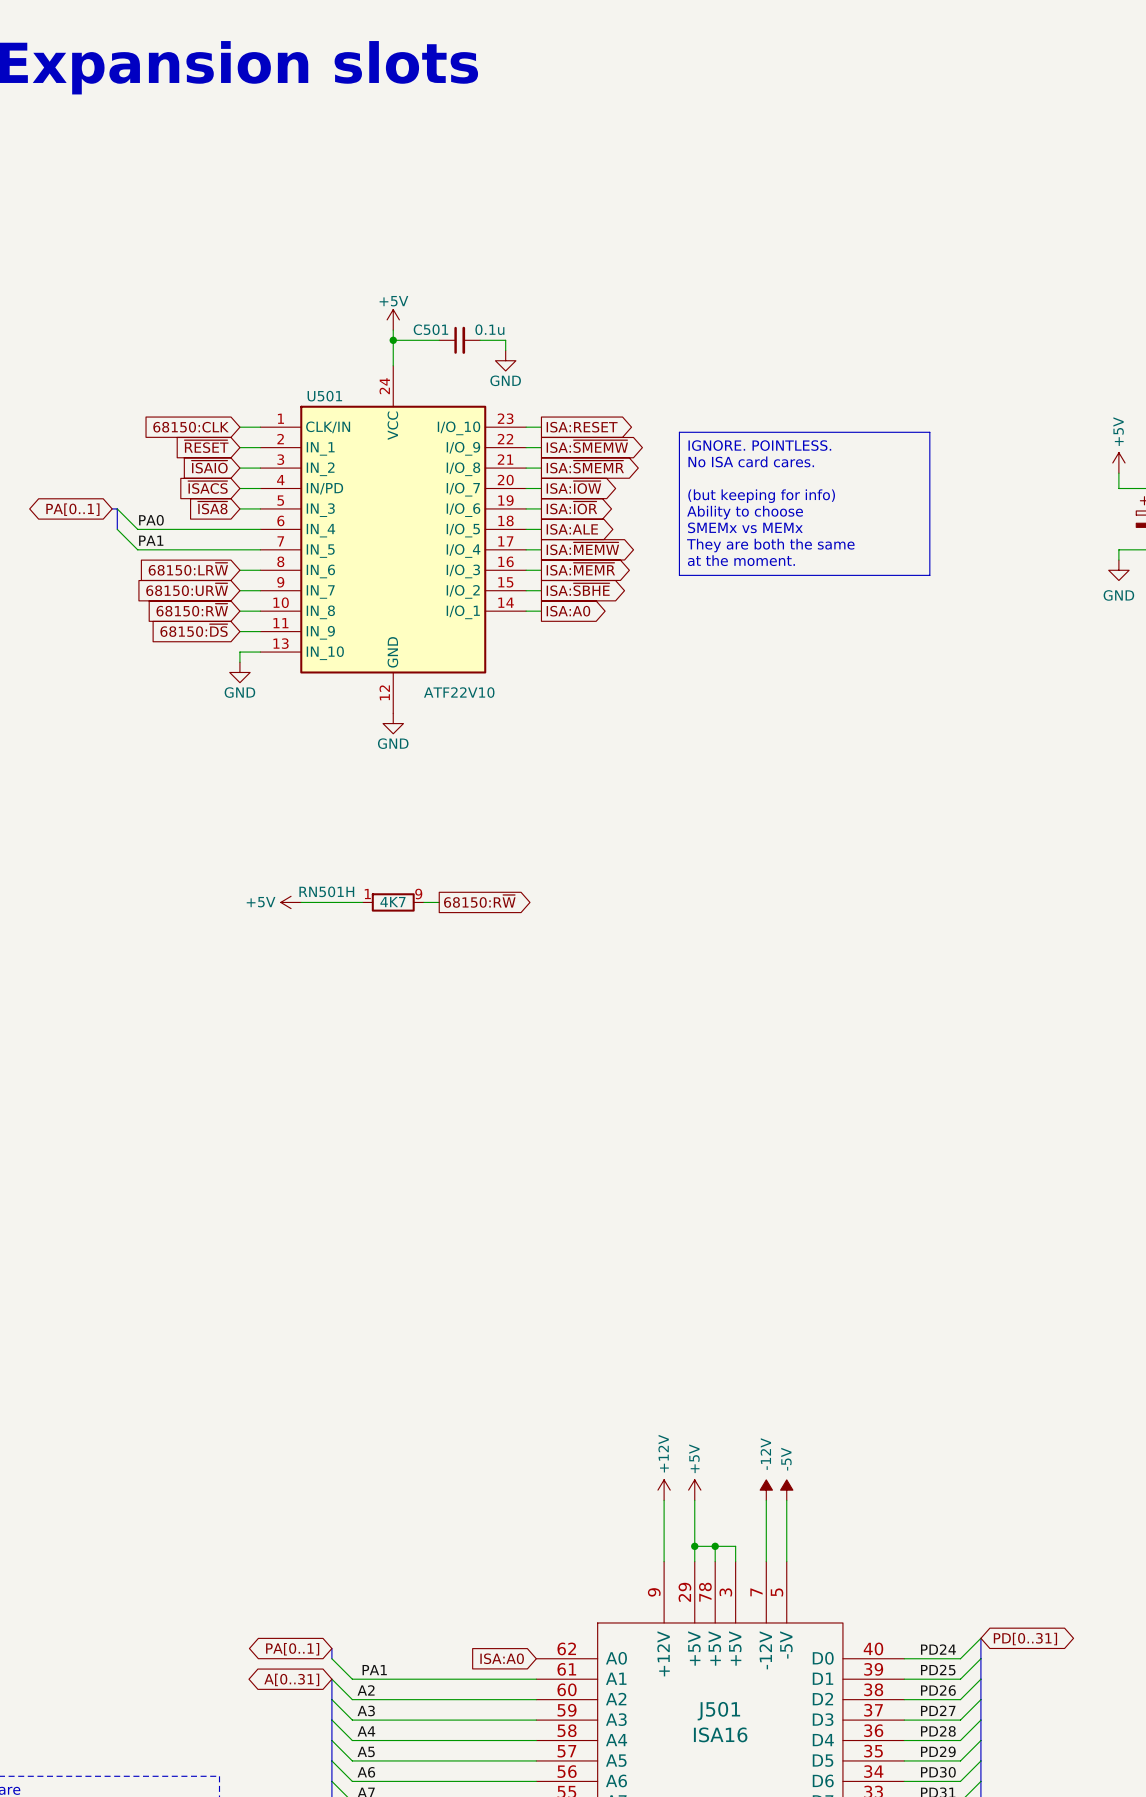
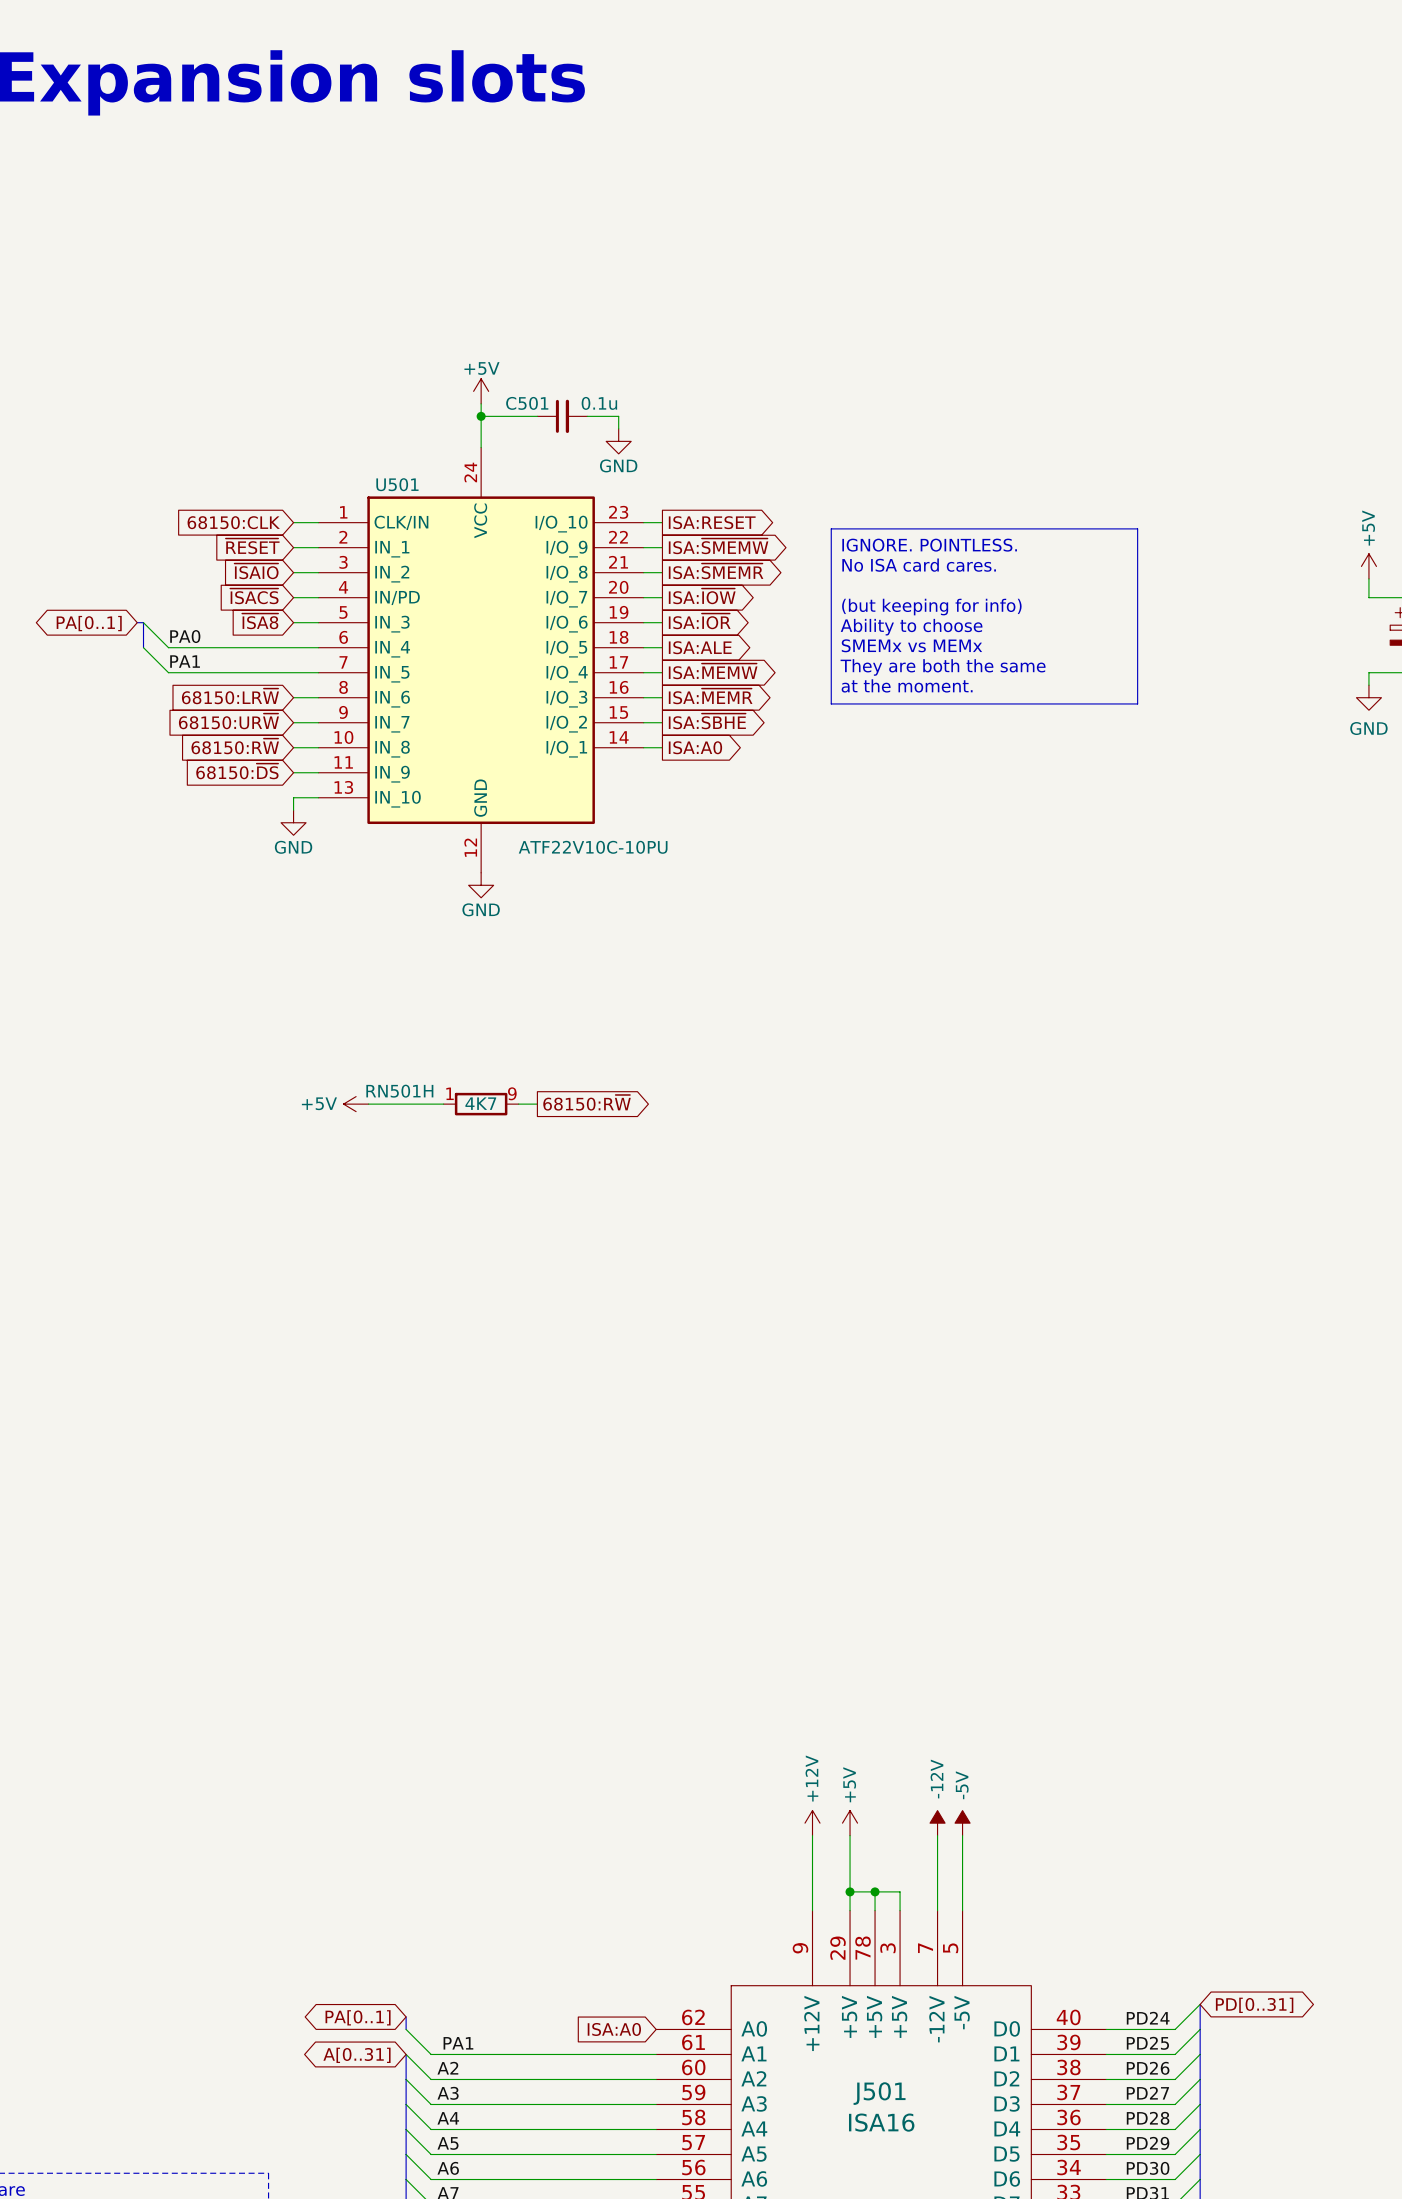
U501 value: ATF22V10 (459, 692) -> ATF22V10C-10PU (593, 847)

